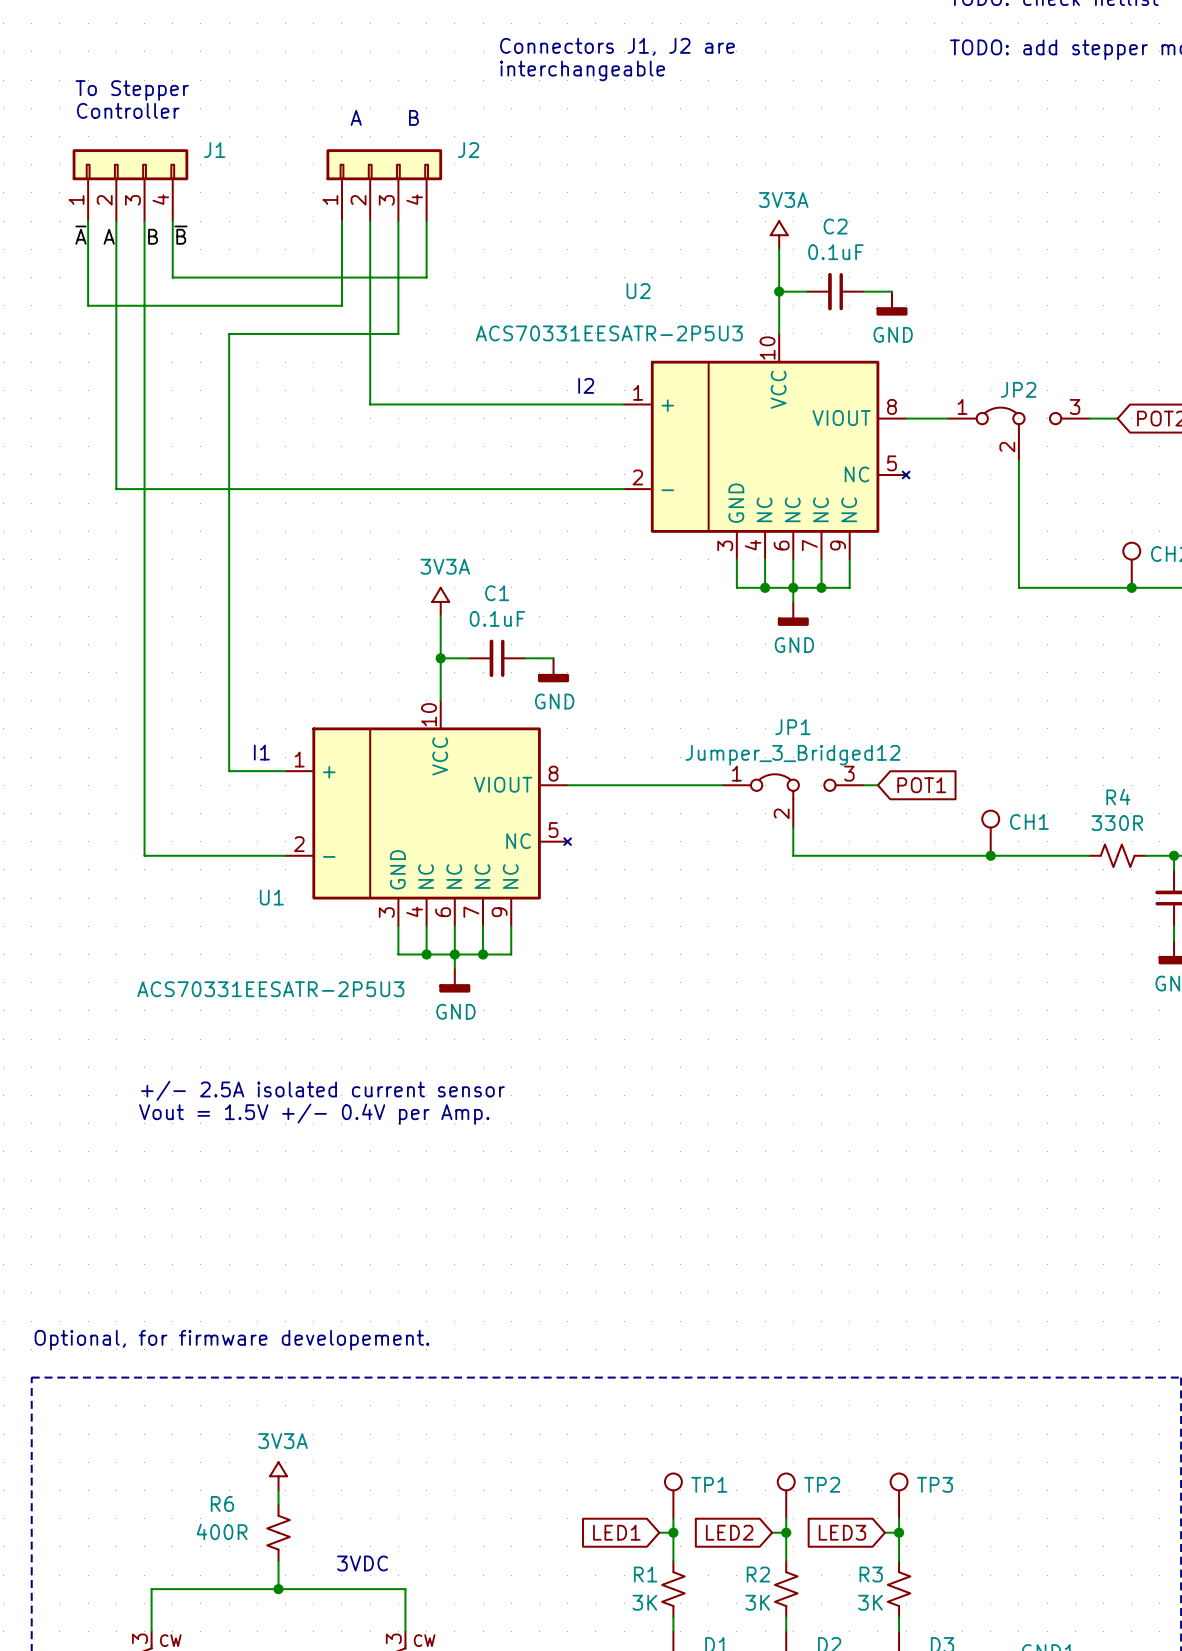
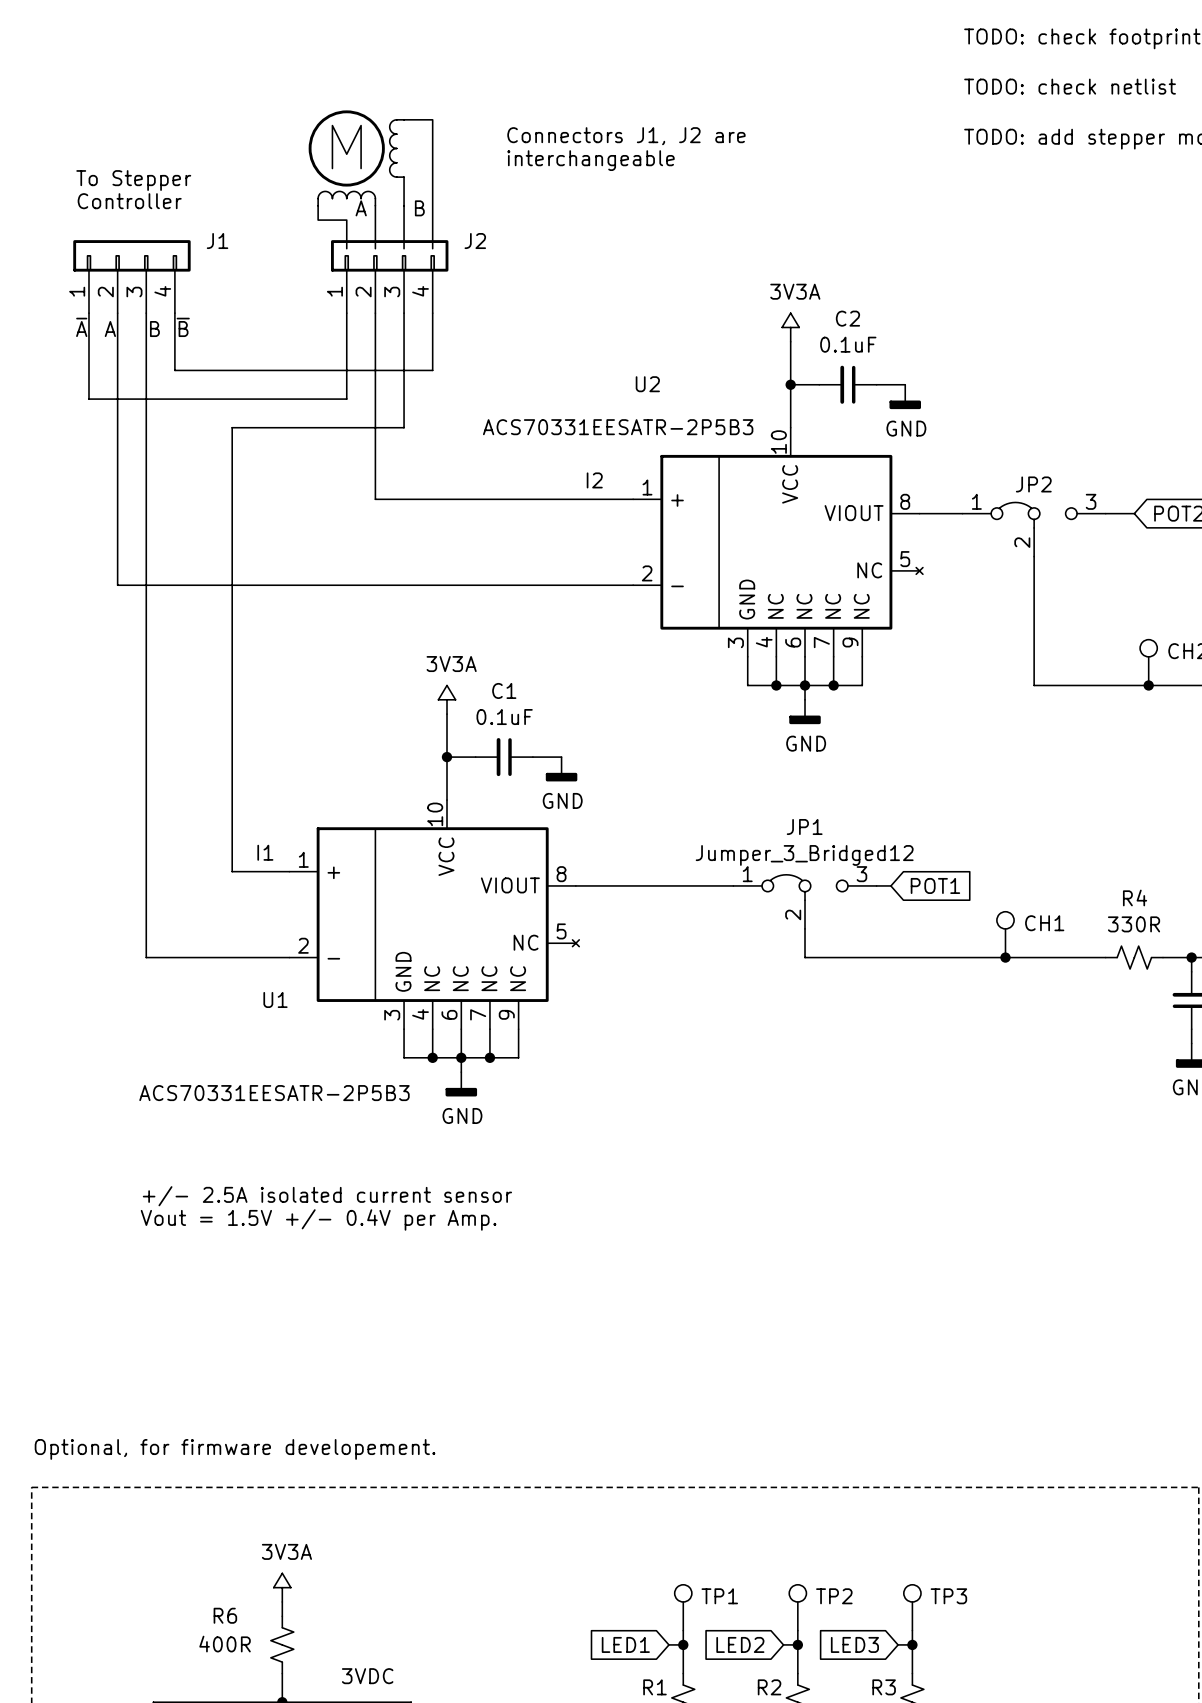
part: none -> (370, 179)
U2 value: ACS70331EESATR-2P5U3 (609, 333) -> ACS70331EESATR-2P5B3 (618, 427)
U1 value: ACS70331EESATR-2P5U3 (270, 989) -> ACS70331EESATR-2P5B3 (274, 1093)

